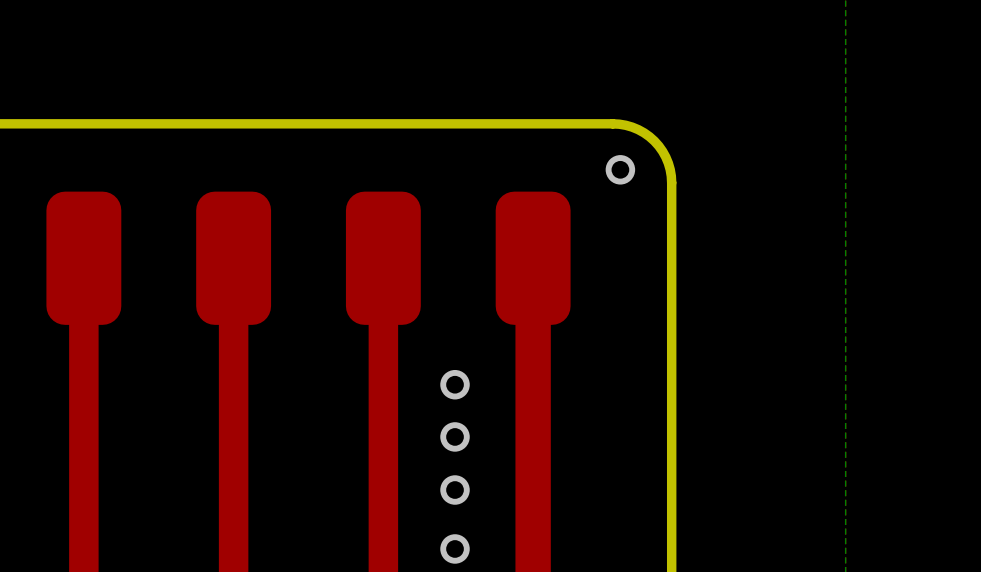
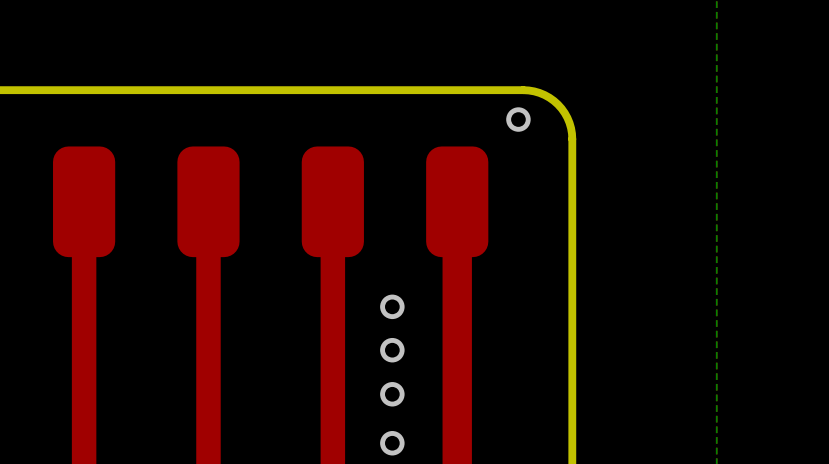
via position: (620, 169) -> (518, 119)

